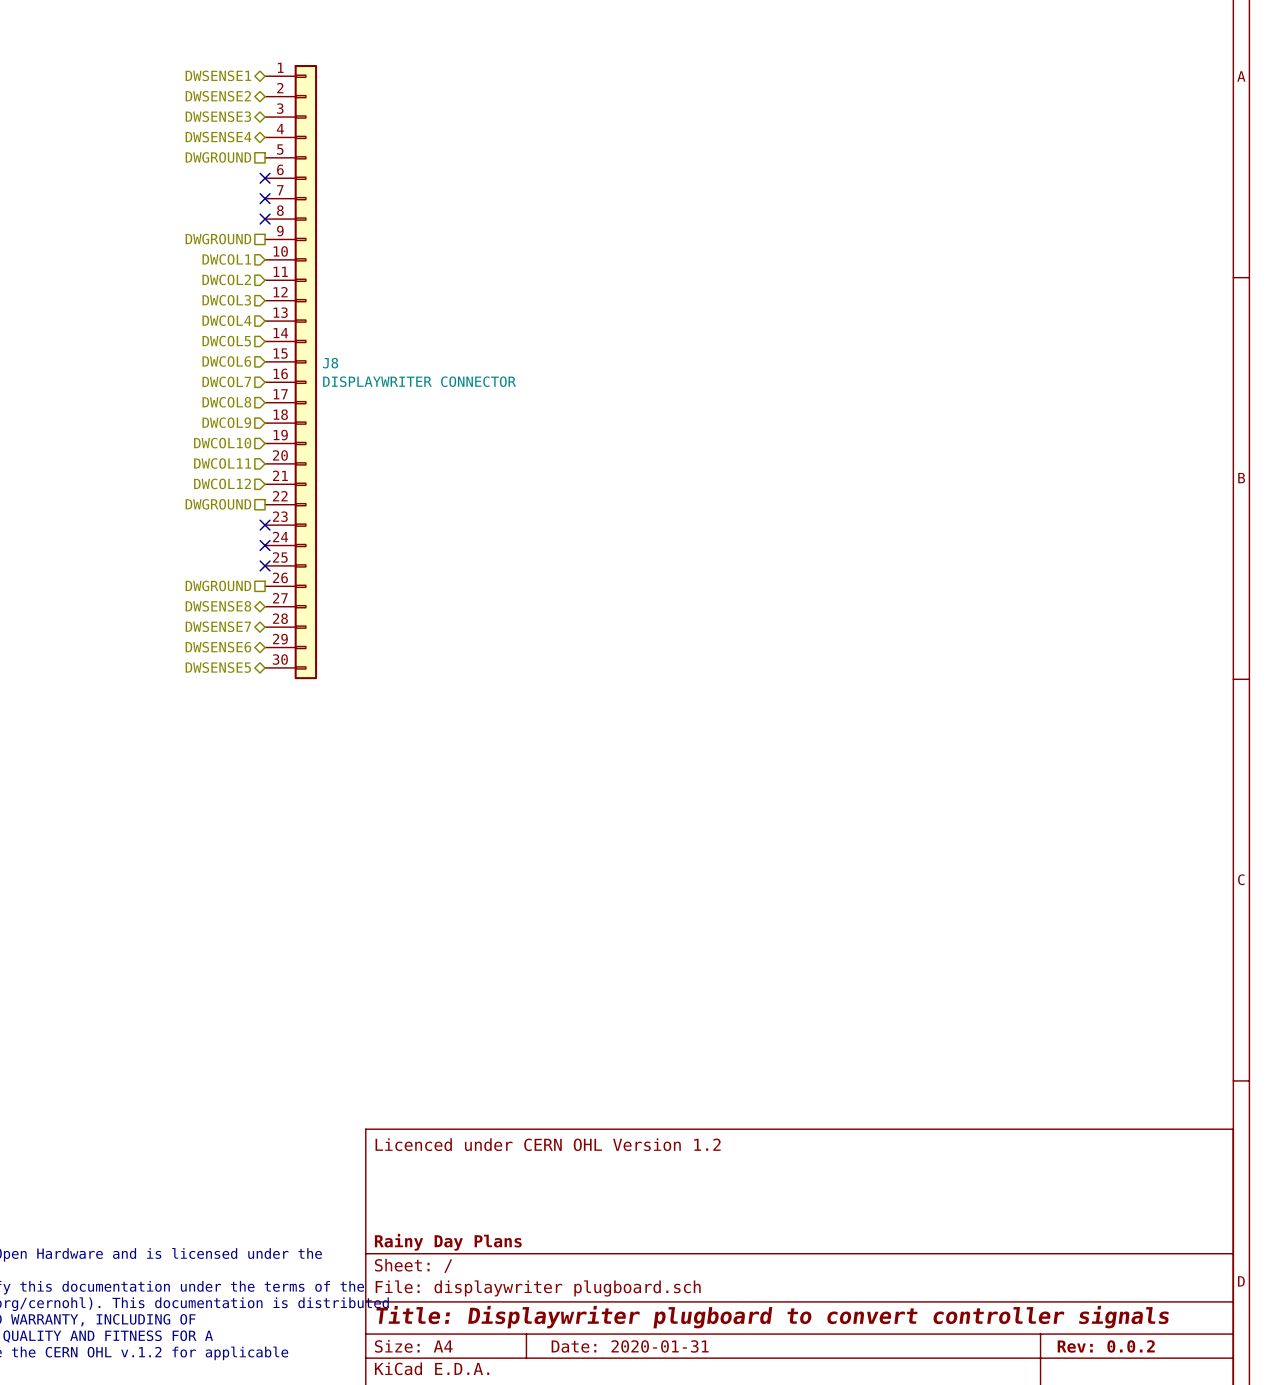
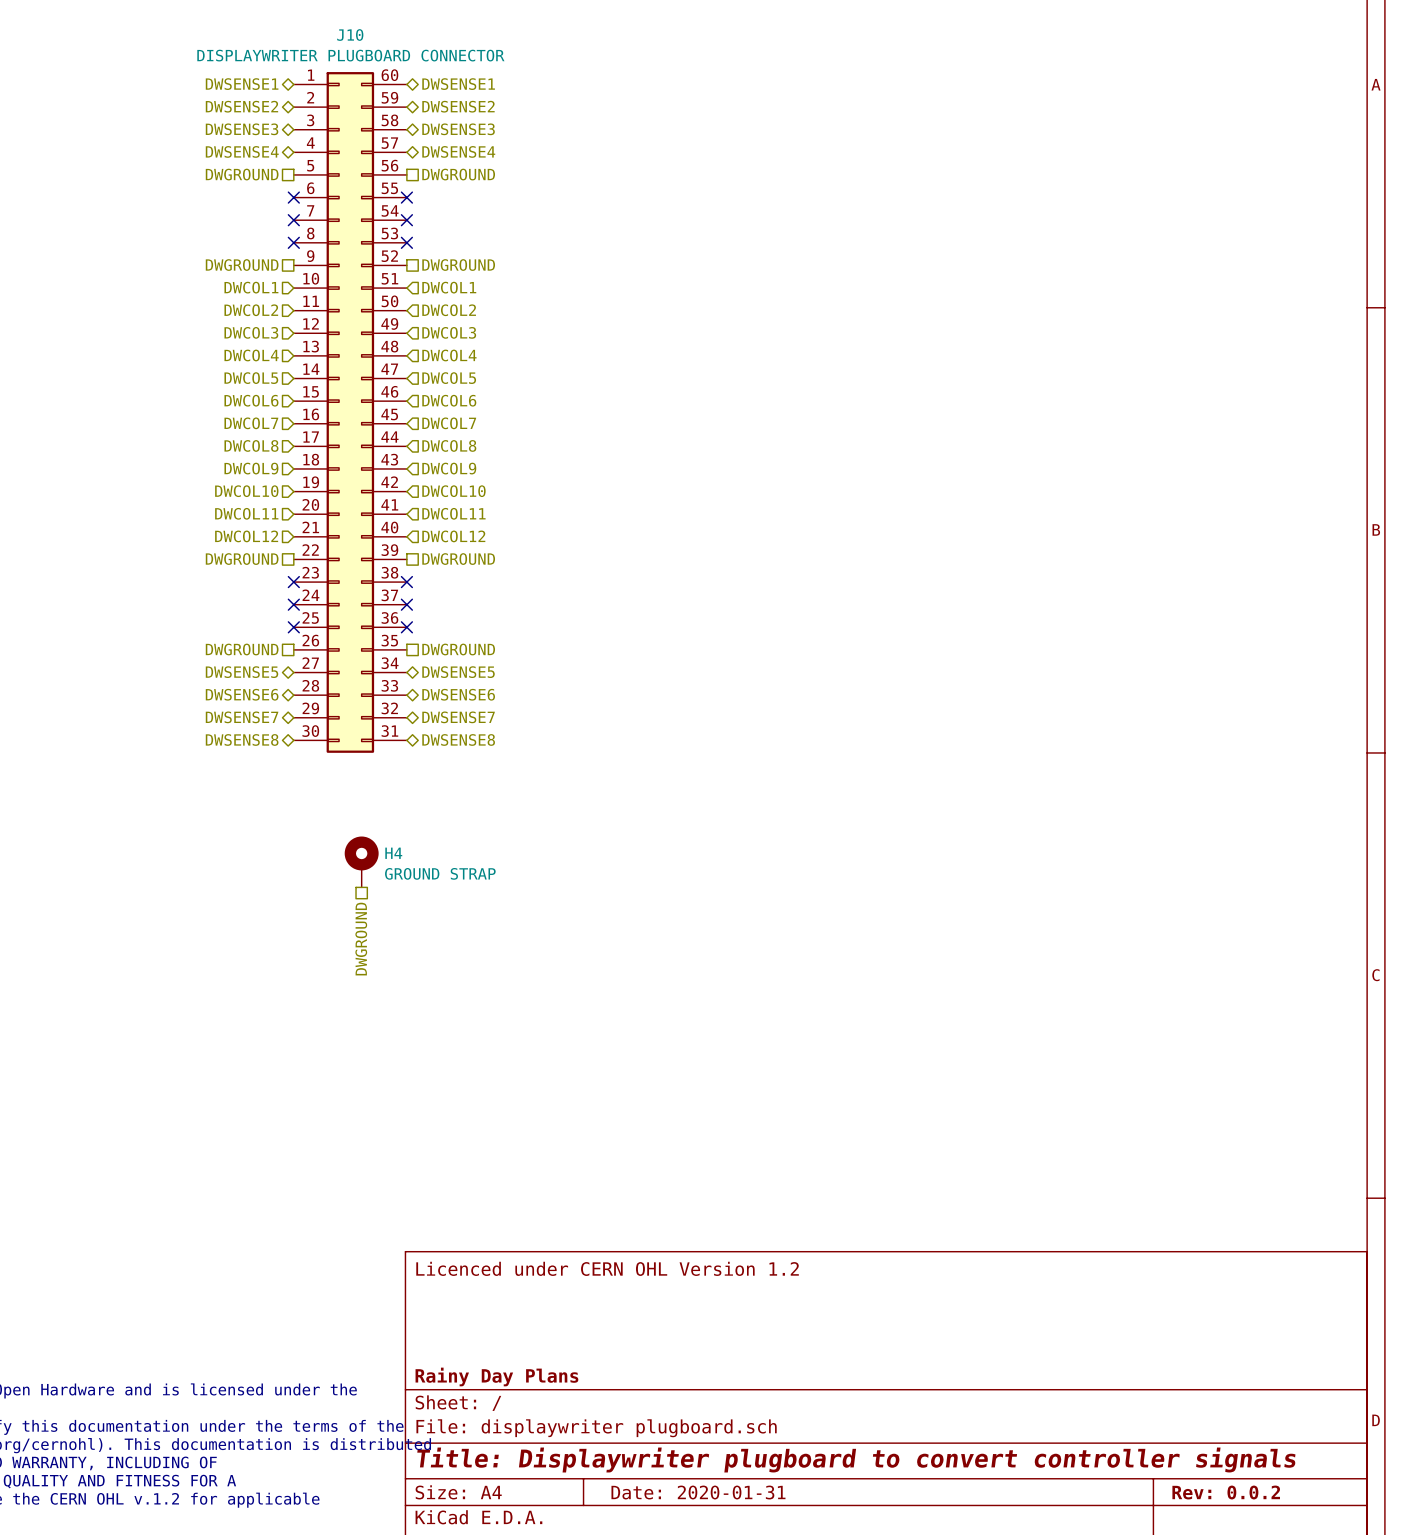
hierarchical label: none -> DWSENSE1 (458, 84)
hierarchical label: none -> DWSENSE2 (458, 106)
hierarchical label: none -> DWSENSE3 (458, 129)
hierarchical label: none -> DWSENSE4 (458, 151)
hierarchical label: none -> DWGROUND (458, 174)
no-connect mark: none -> (406, 197)
no-connect mark: none -> (406, 220)
no-connect mark: none -> (406, 242)
hierarchical label: none -> DWGROUND (458, 265)
hierarchical label: none -> DWCOL1 (449, 287)
hierarchical label: none -> DWCOL2 (449, 310)
hierarchical label: none -> DWCOL3 (449, 332)
hierarchical label: none -> DWCOL4 (449, 355)
hierarchical label: none -> DWCOL5 (449, 378)
hierarchical label: none -> DWCOL6 (449, 400)
J8: DISPLAYWRITER CONNECTOR (291, 372) -> none
J10: none -> DISPLAYWRITER PLUGBOARD CONNECTOR (350, 412)
hierarchical label: none -> DWCOL7 (449, 423)
hierarchical label: none -> DWCOL8 (449, 445)
hierarchical label: none -> DWCOL9 (449, 468)
hierarchical label: none -> DWCOL10 (453, 491)
hierarchical label: none -> DWCOL11 (453, 513)
hierarchical label: none -> DWCOL12 (453, 536)
hierarchical label: none -> DWGROUND (458, 559)
no-connect mark: none -> (406, 582)
no-connect mark: none -> (406, 604)
no-connect mark: none -> (406, 627)
hierarchical label: none -> DWGROUND (458, 649)
hierarchical label: DWSENSE8 (218, 606) -> DWSENSE5 (242, 672)
hierarchical label: none -> DWSENSE5 (458, 672)
hierarchical label: DWSENSE7 (218, 626) -> DWSENSE6 (242, 694)
hierarchical label: none -> DWSENSE6 (458, 694)
hierarchical label: DWSENSE6 (218, 647) -> DWSENSE7 (242, 717)
hierarchical label: none -> DWSENSE7 (458, 717)
hierarchical label: DWSENSE5 (218, 667) -> DWSENSE8 (242, 739)
hierarchical label: none -> DWSENSE8 (458, 739)
H4: none -> GROUND STRAP (361, 861)
hierarchical label: none -> DWGROUND (361, 939)

